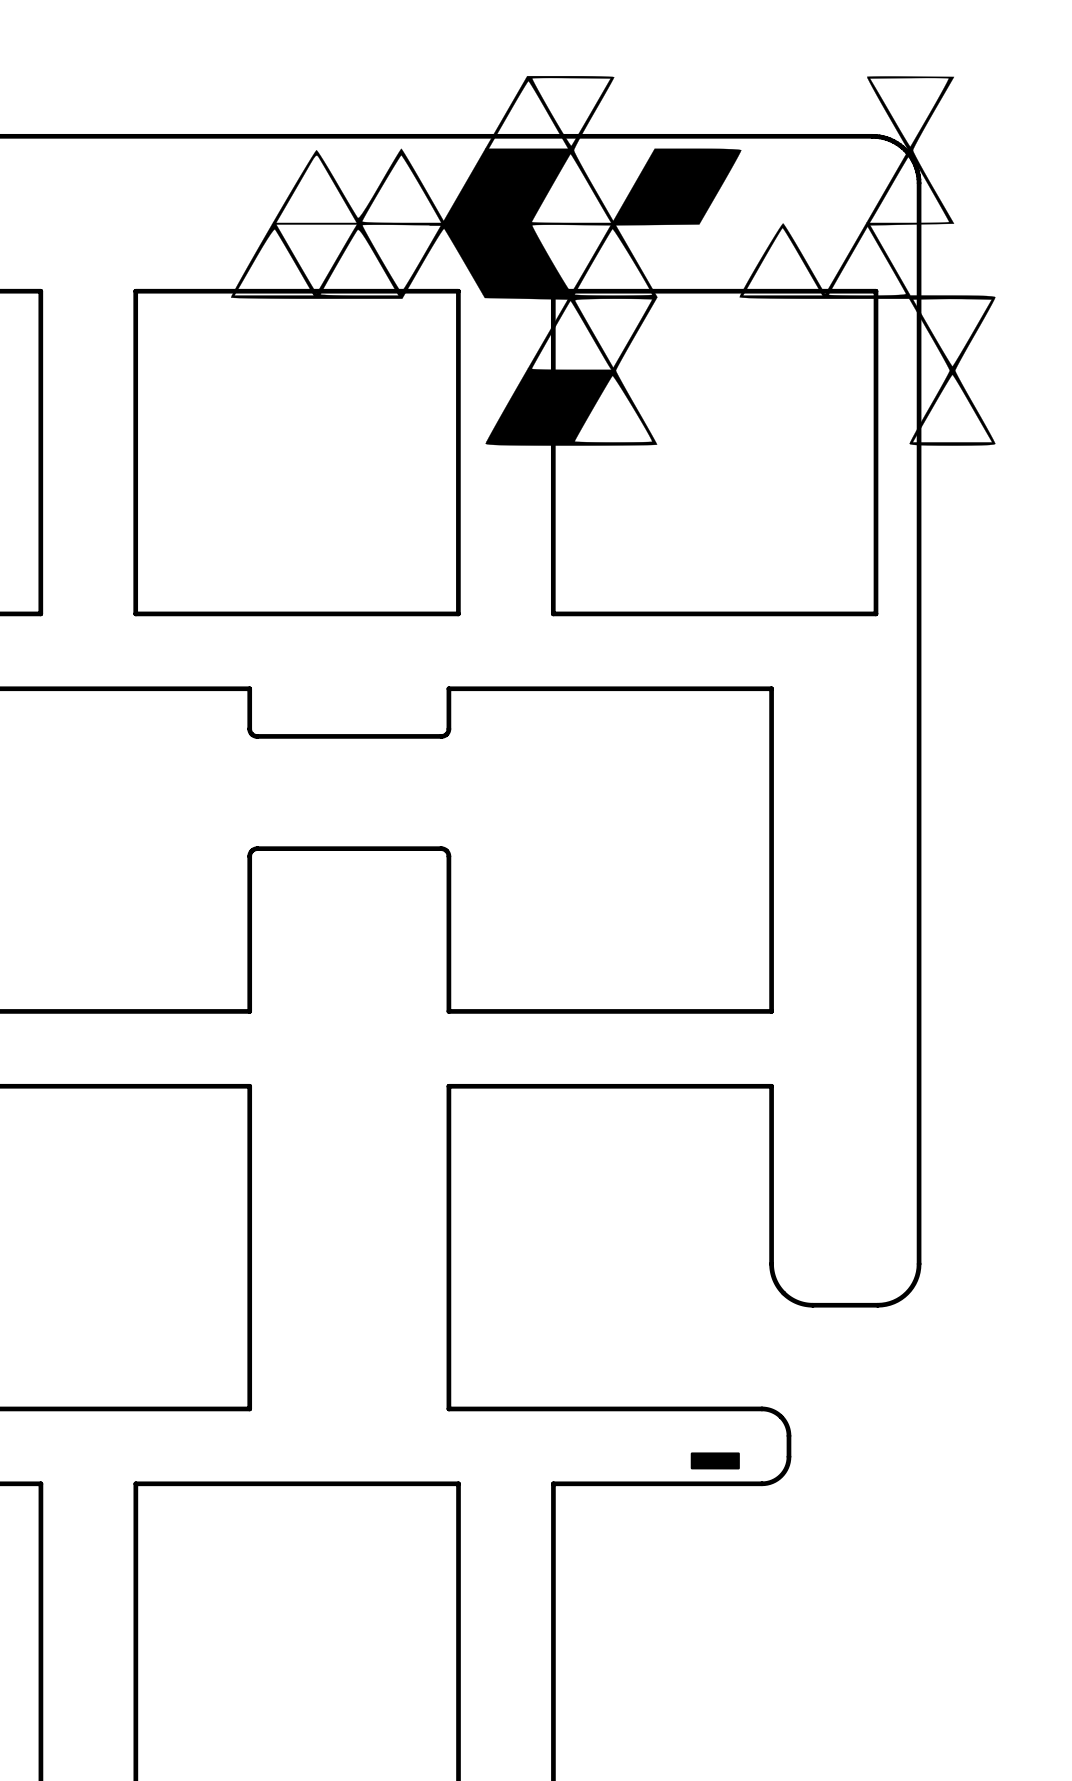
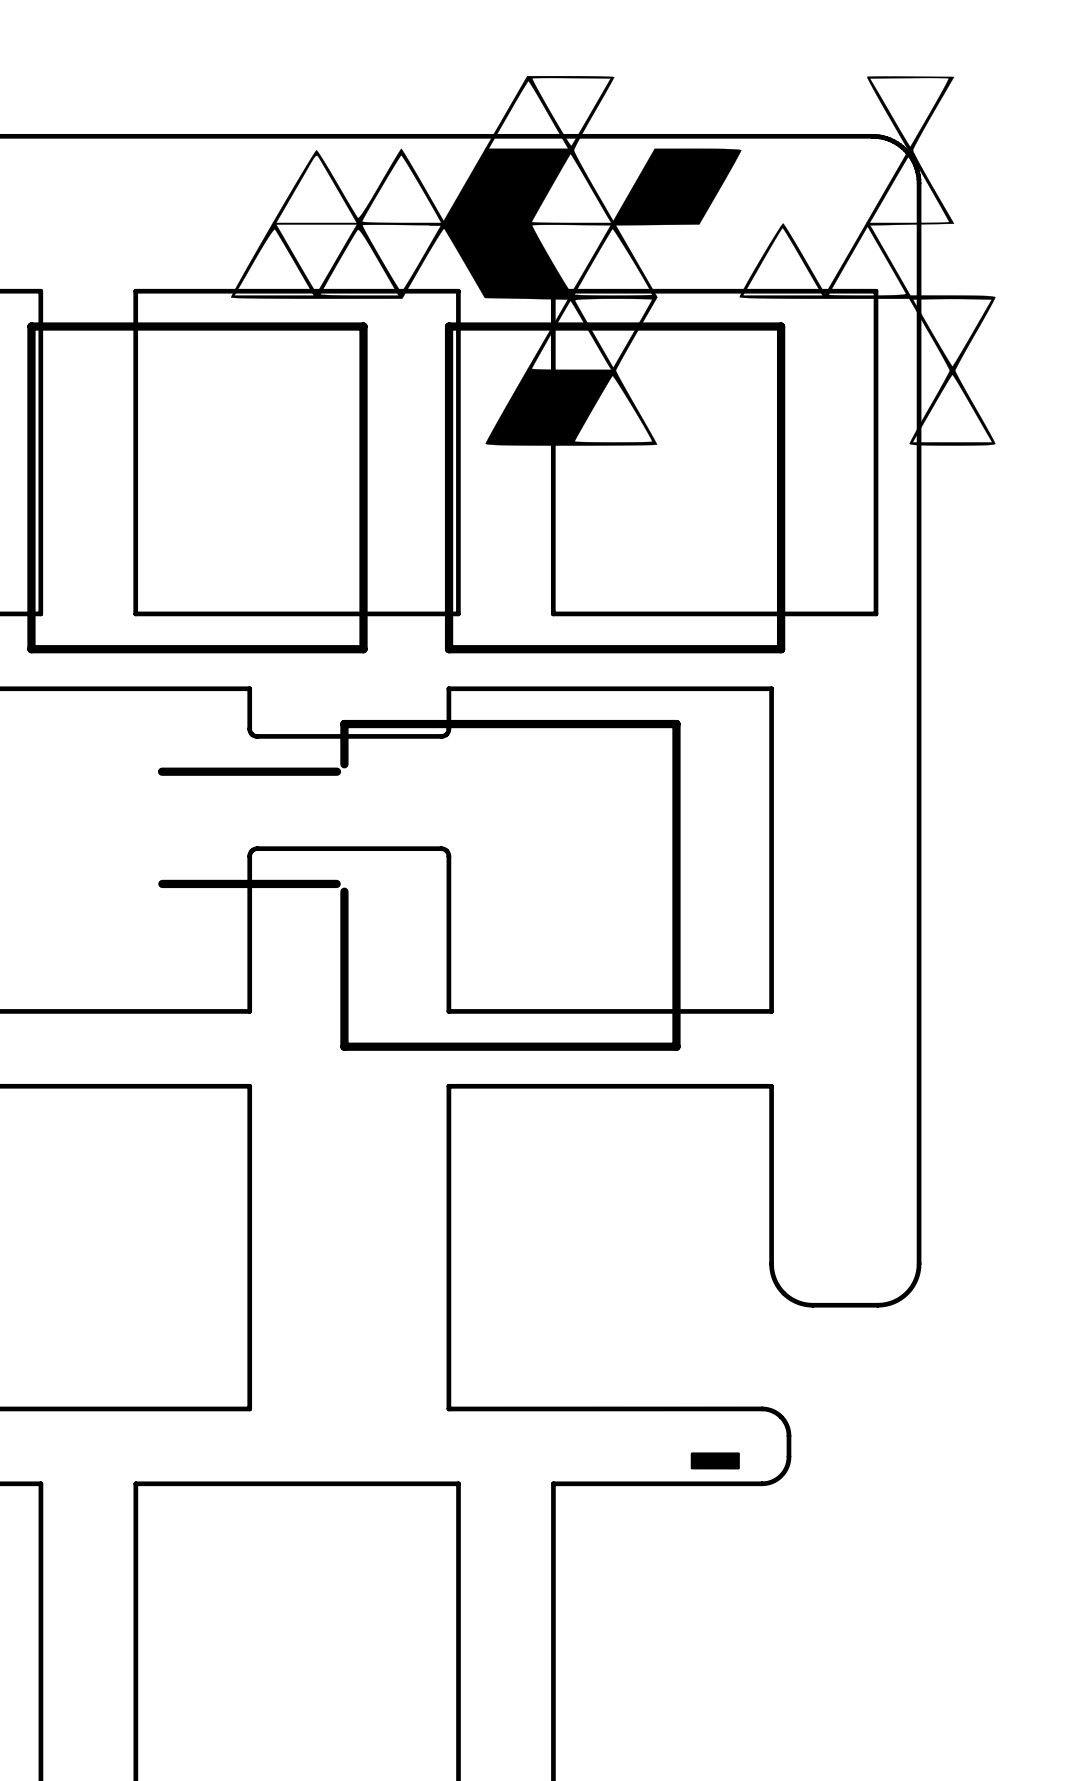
board edge: none -> (31, 326) (363, 326) (363, 649) (31, 649) (31, 326)
board edge: none -> (449, 326) (781, 326) (781, 649) (449, 649) (449, 326)
board edge: none -> (344, 764) (344, 724) (676, 724) (676, 1046) (344, 1046) (344, 891)
board edge: none -> (162, 771) (337, 771)
board edge: none -> (162, 883) (336, 883)

